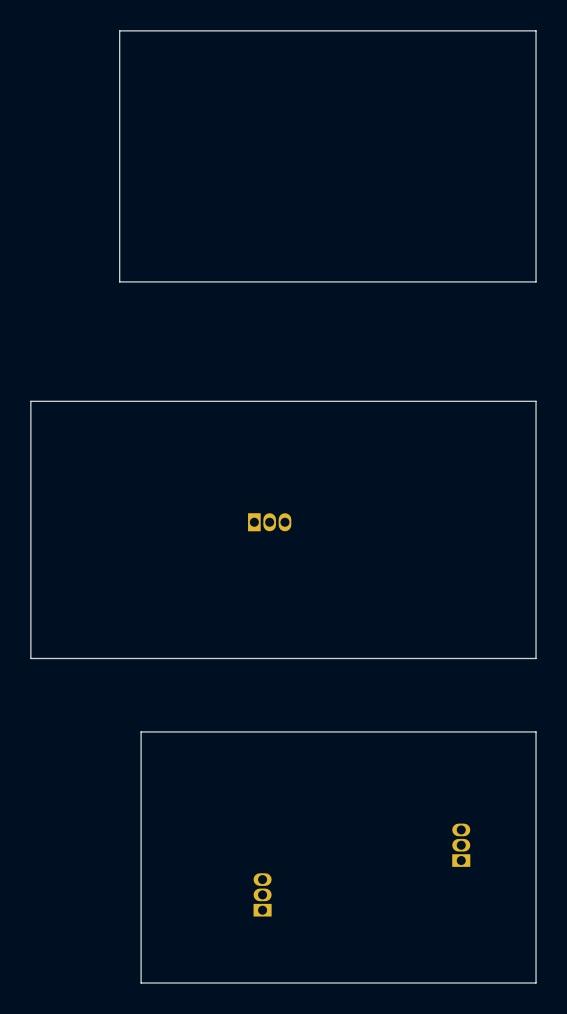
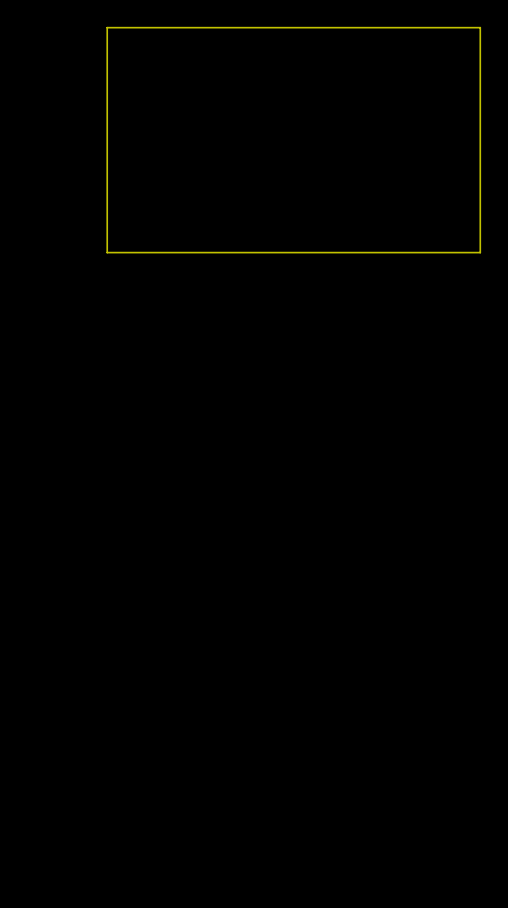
board edge: (536, 401) (536, 658) (30, 658) (30, 401) (536, 401) -> none
part: (269, 522) -> none
board edge: (536, 731) (141, 731) (141, 983) (536, 983) (536, 731) -> none
part: (461, 845) -> none
part: (262, 894) -> none

